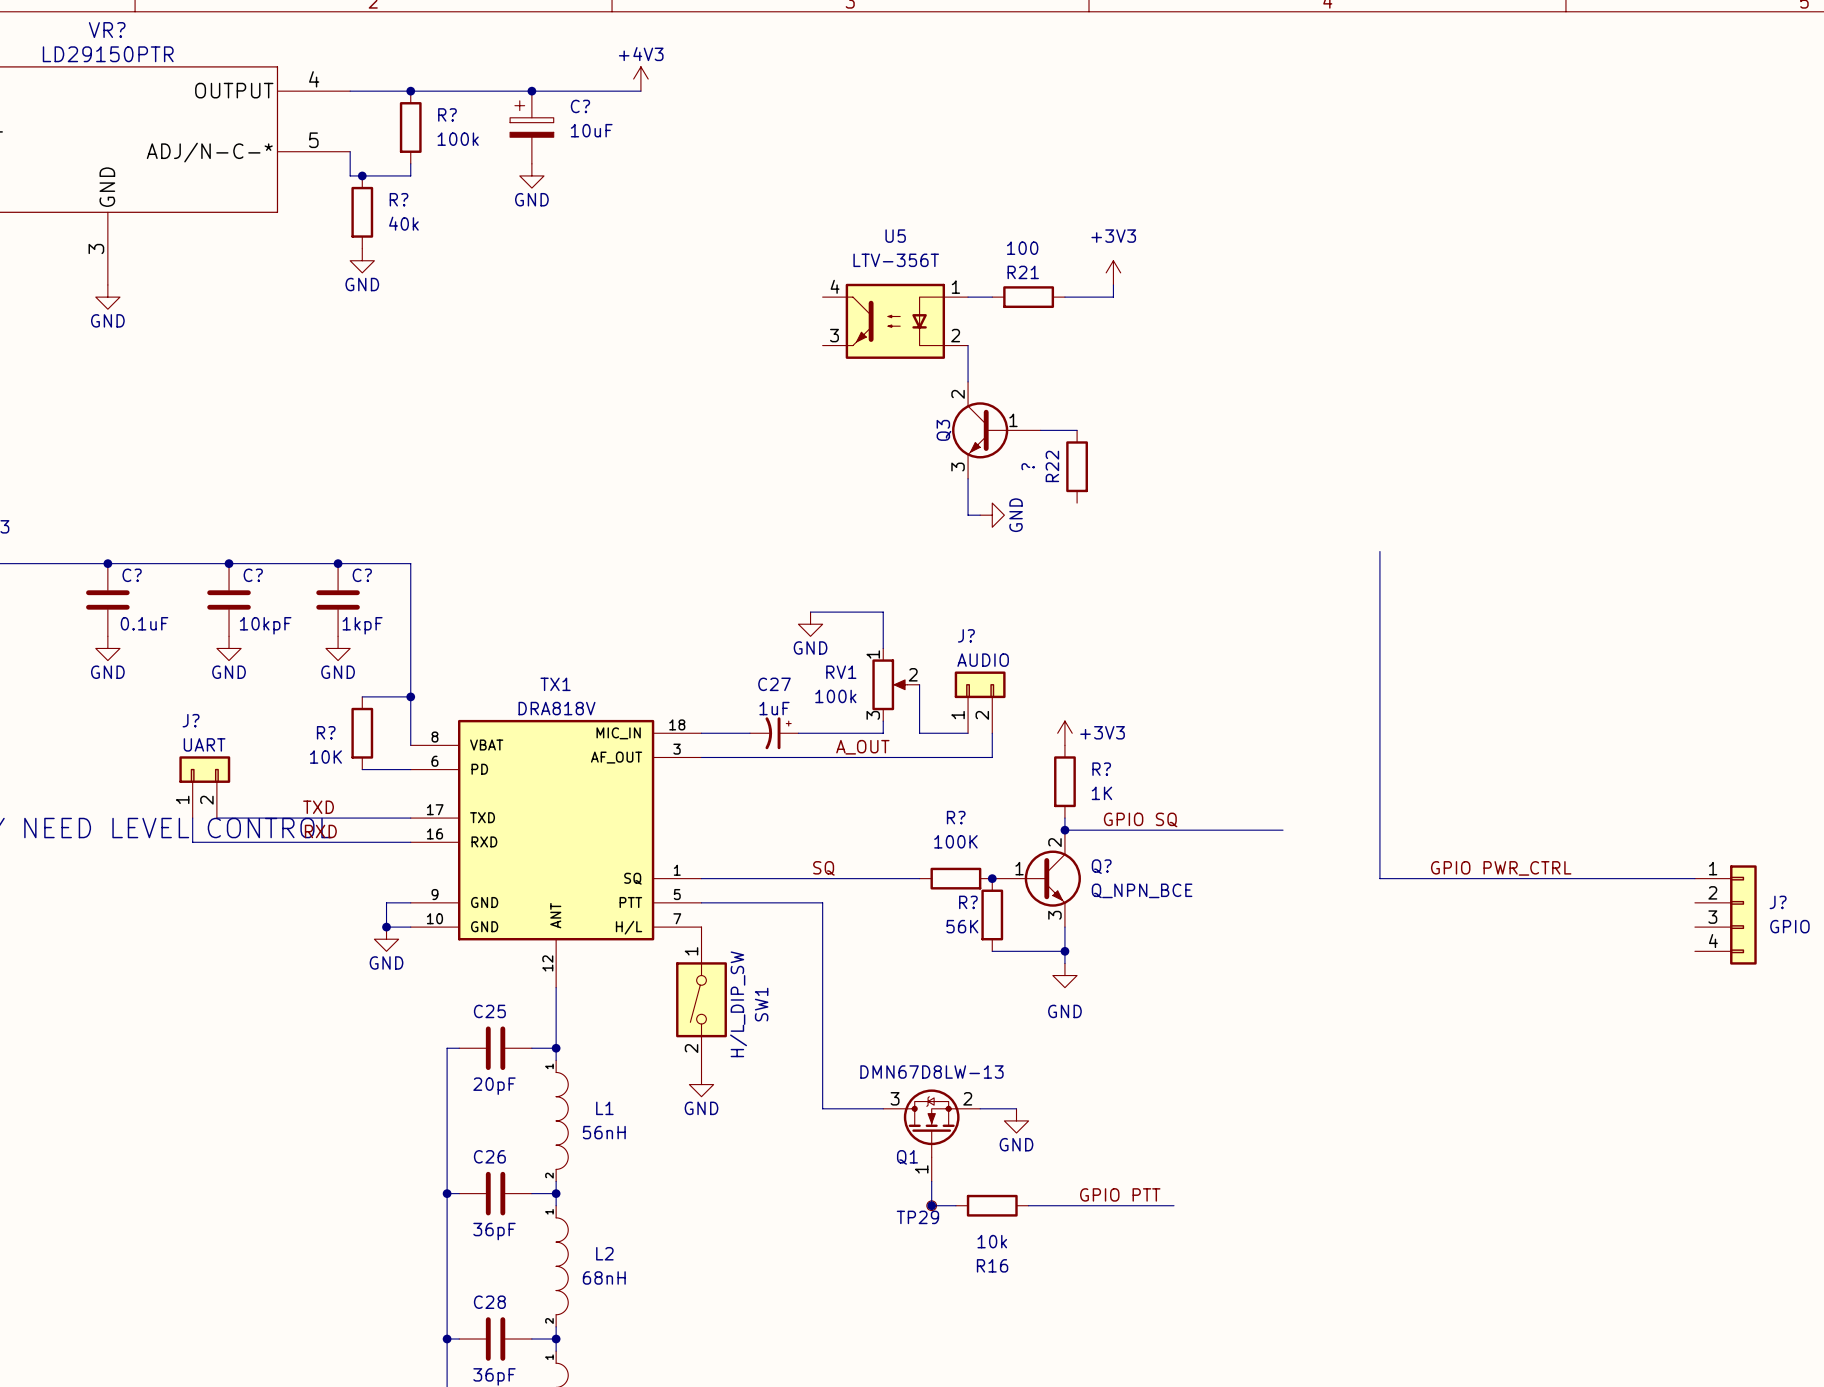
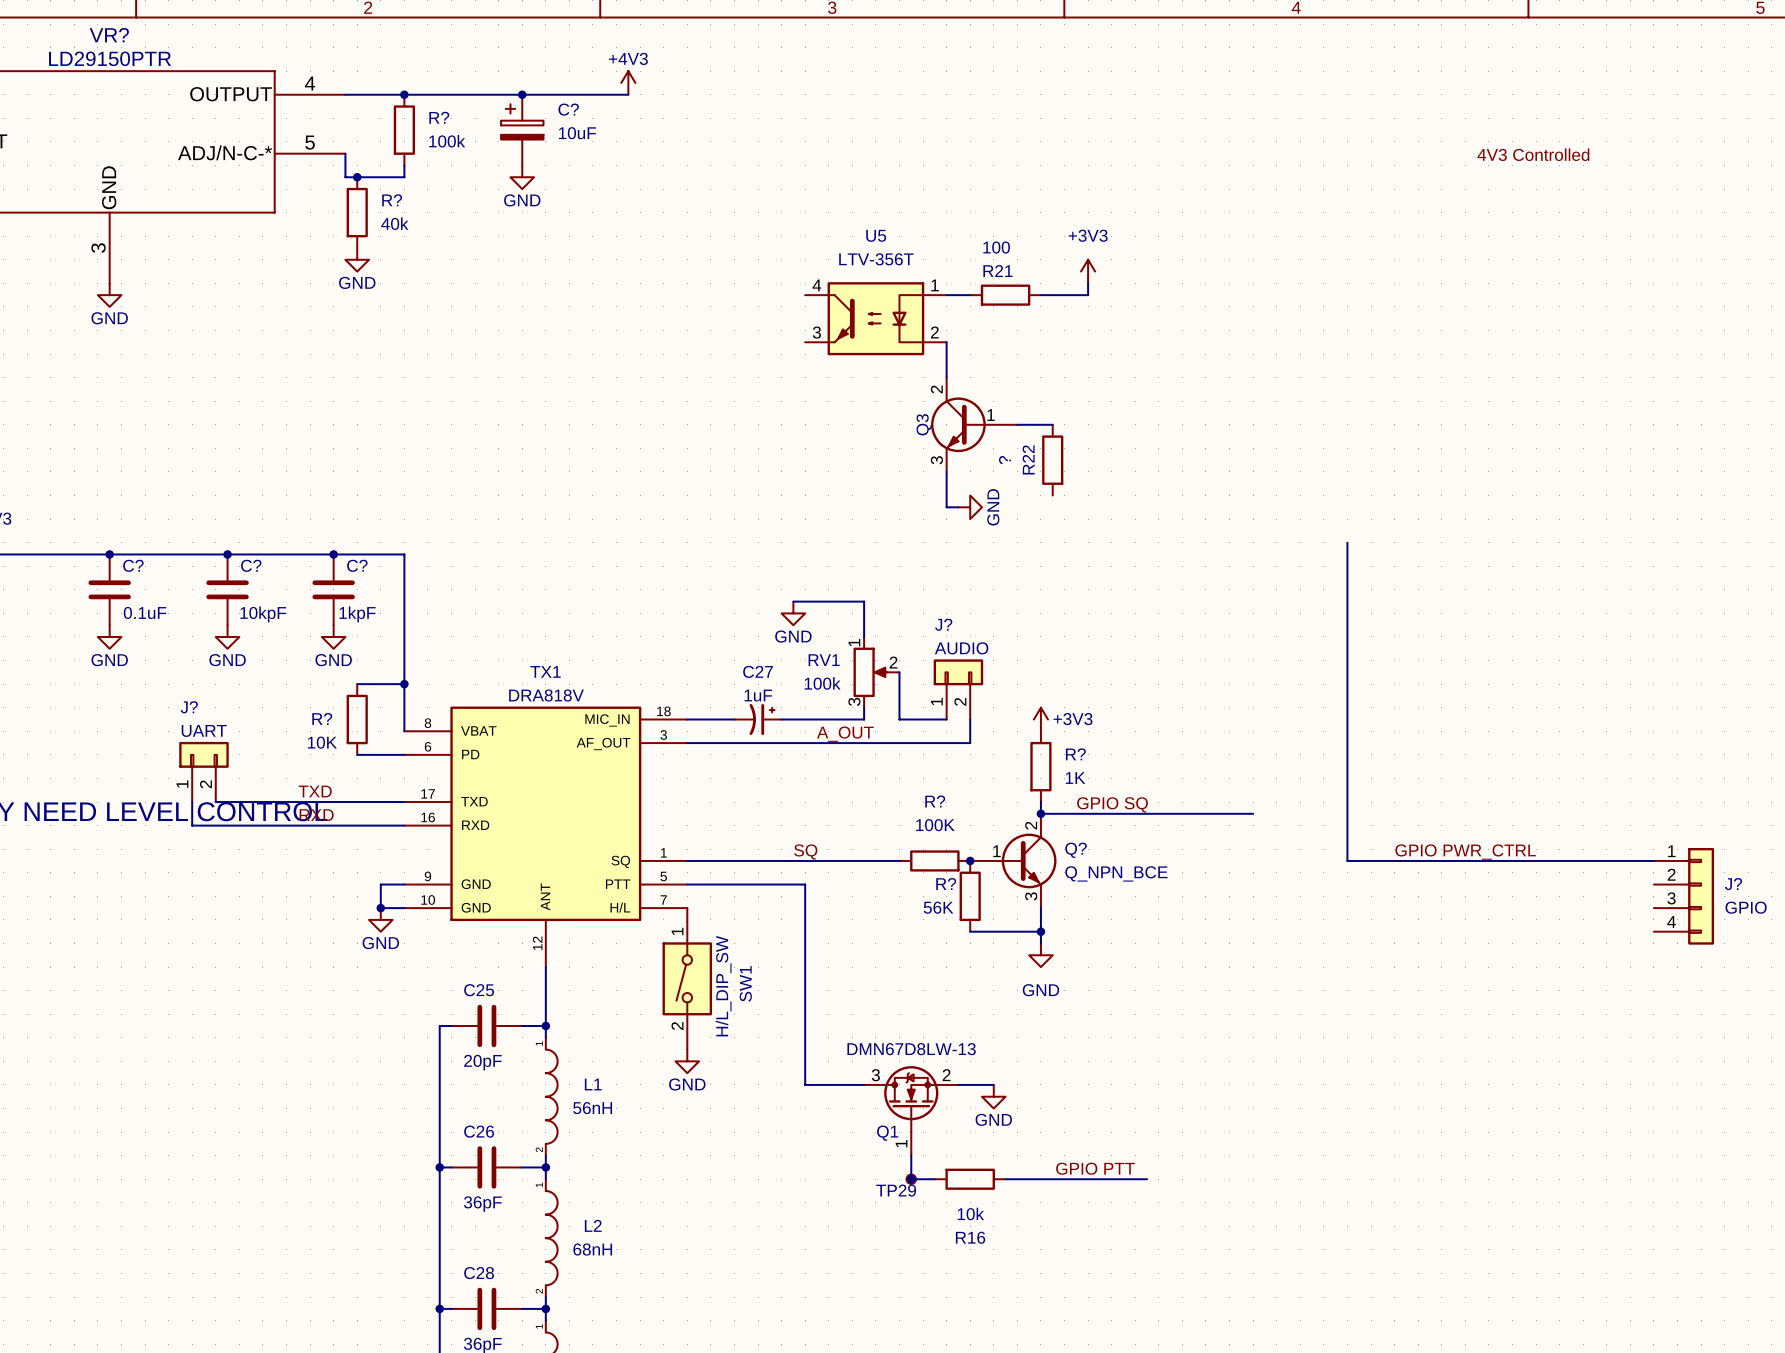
label: none -> 4V3 Controlled (1533, 154)

